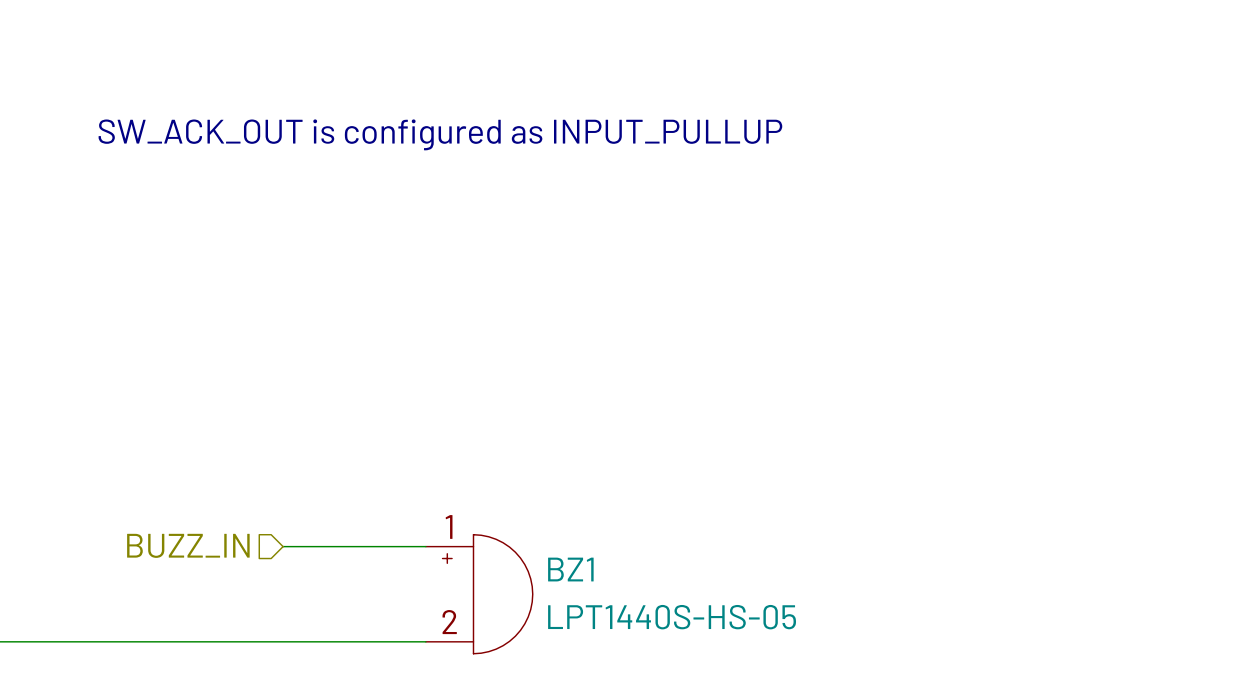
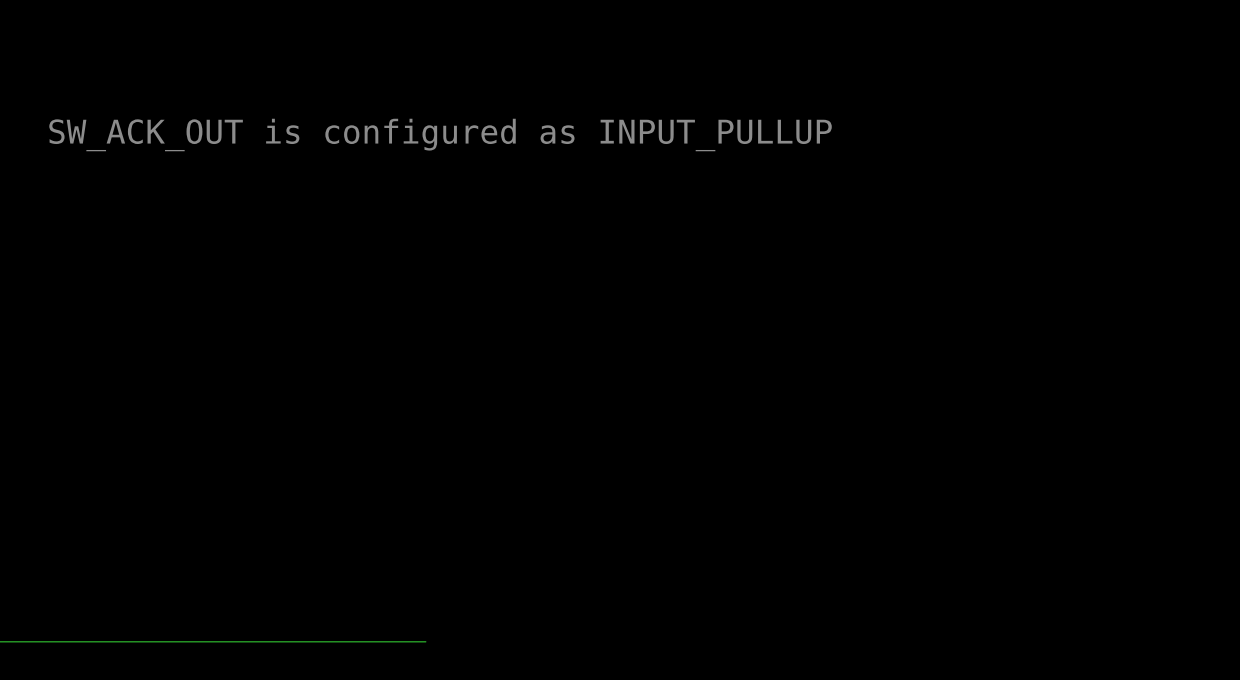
hierarchical label: BUZZ_IN (188, 545) -> none
wire: (283, 546) (425, 546) -> none
BZ1: LPT1440S-HS-05 (479, 594) -> none

